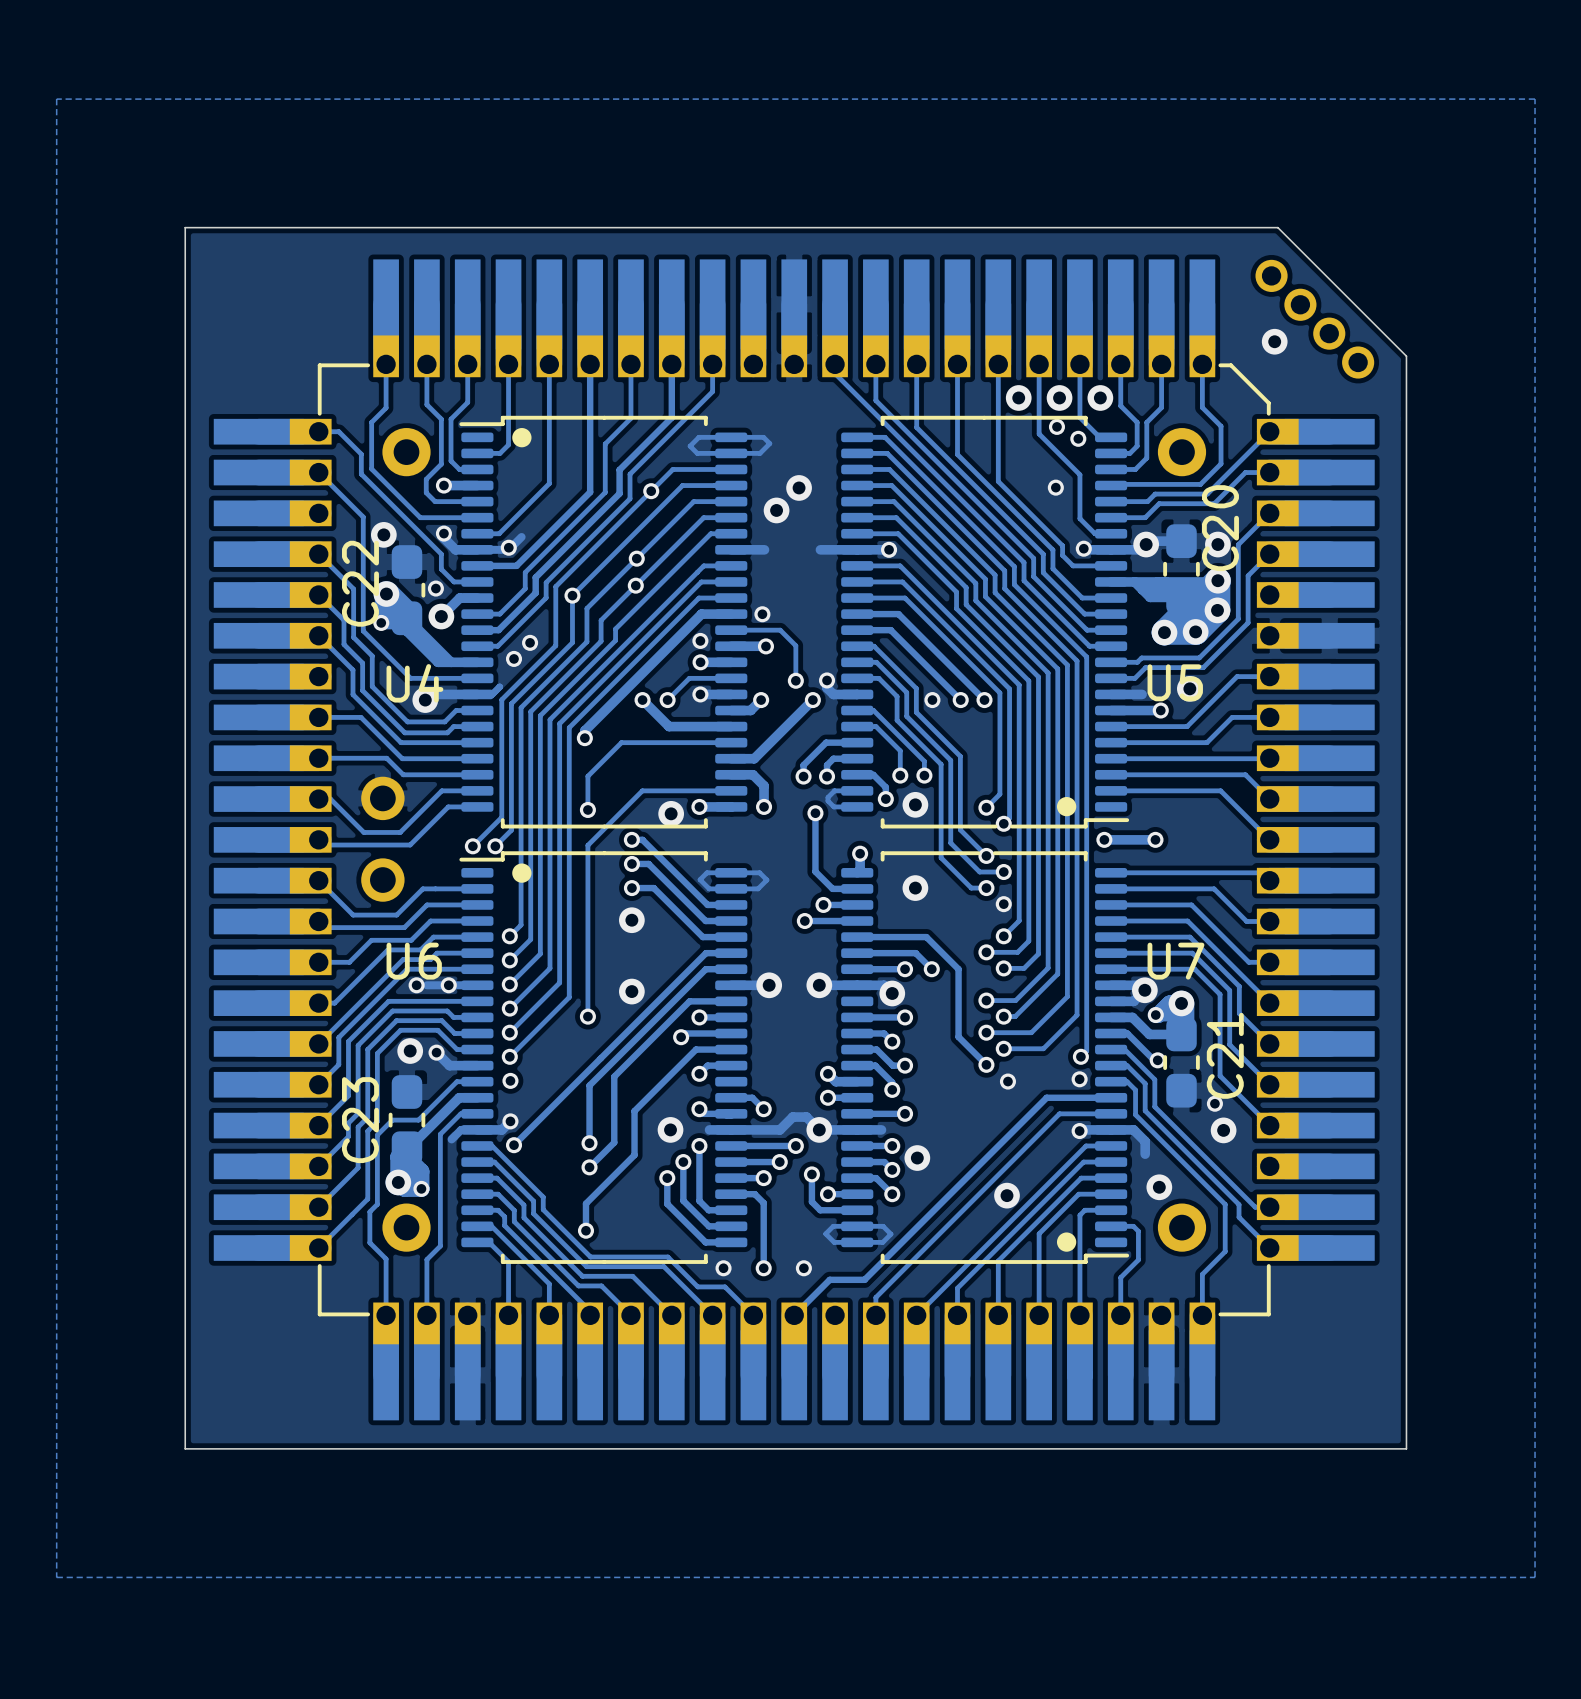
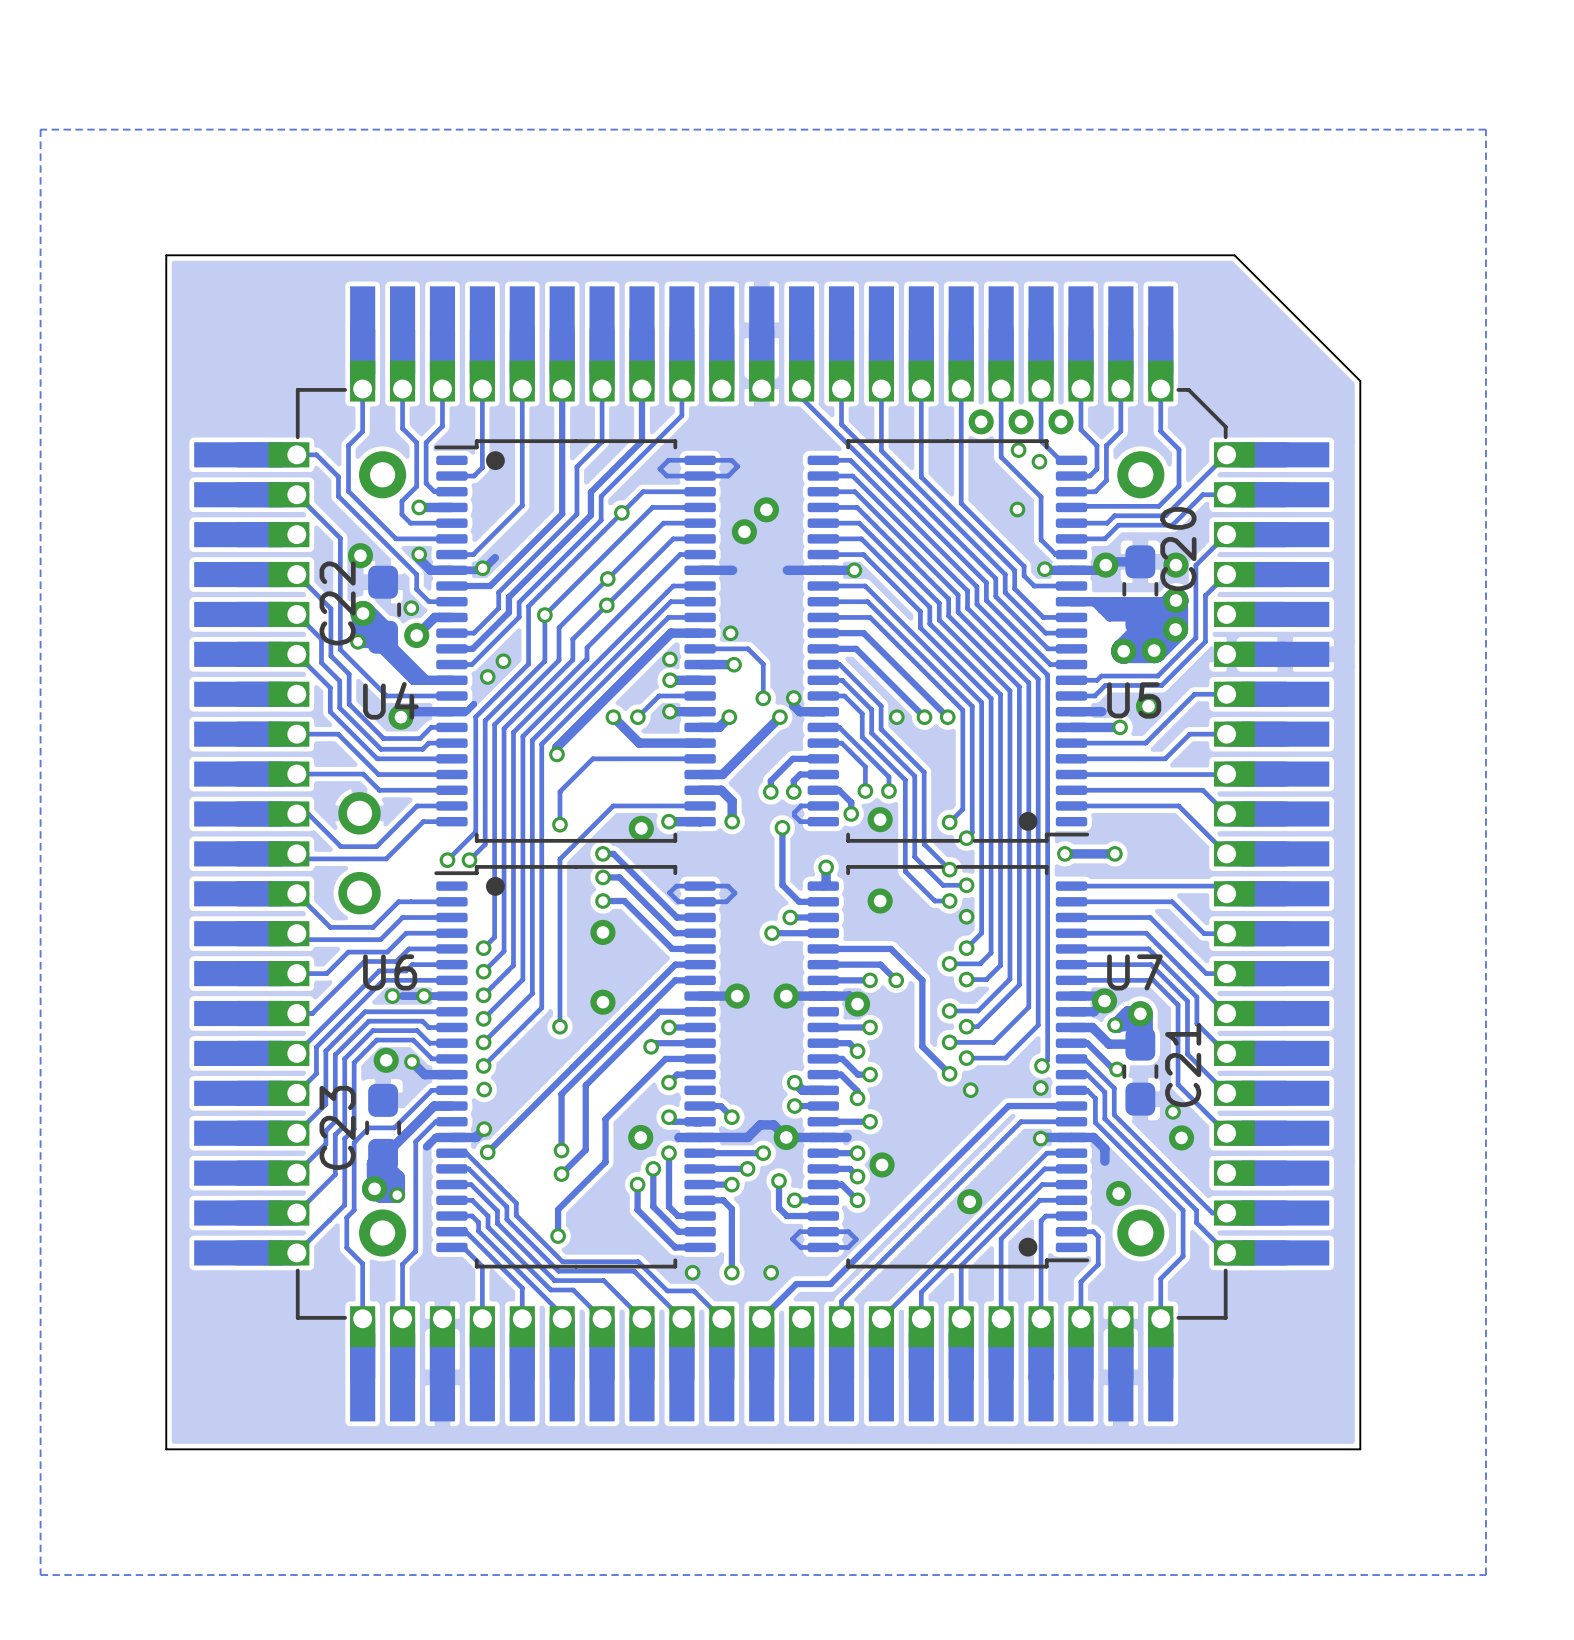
part: (1314, 319) -> none
via: (1274, 341) -> none

